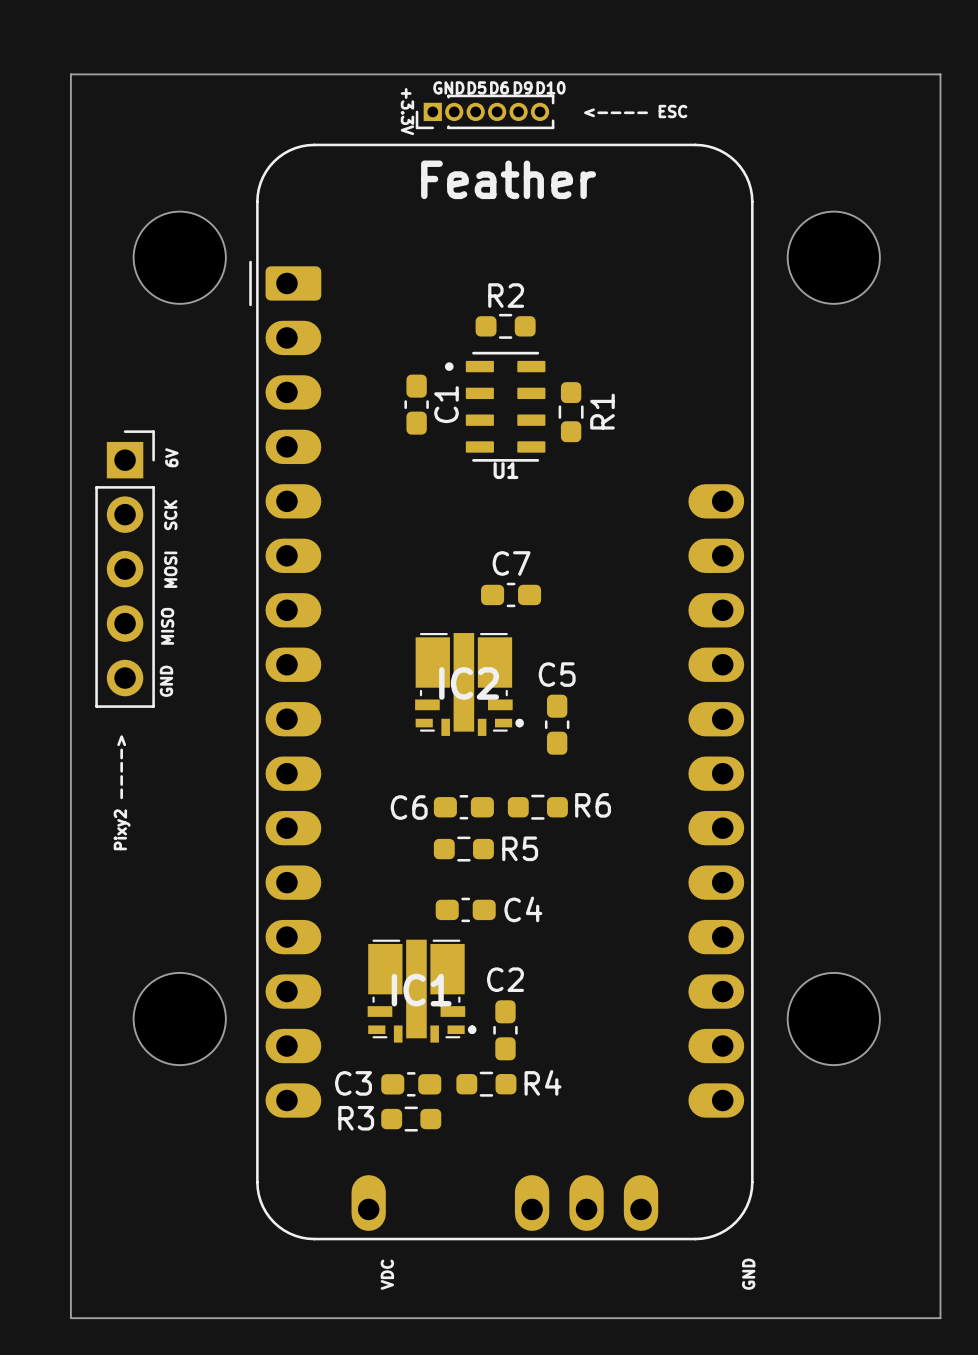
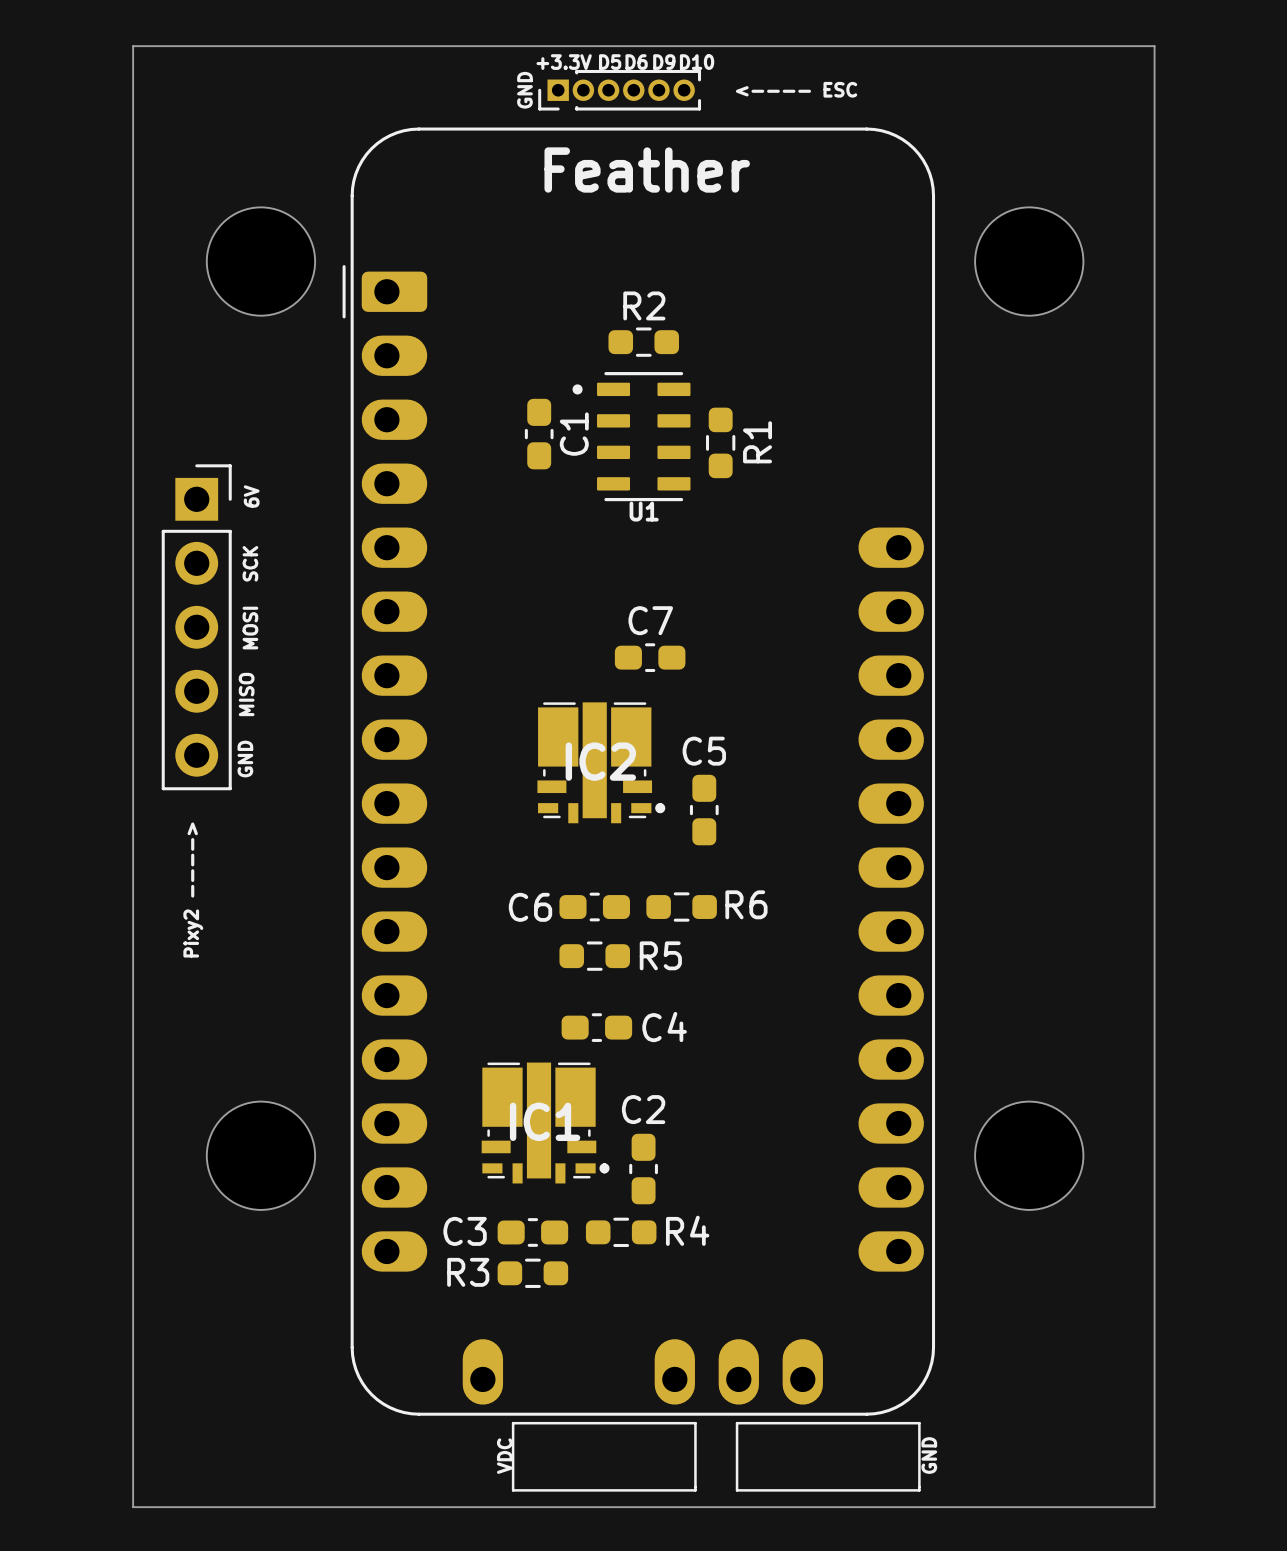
text: GND (448, 87) -> +3.3V (564, 62)
text: +3.3V (407, 111) -> GND (524, 90)
line: none -> (513, 1423) (695, 1423) (695, 1490) (513, 1490) (513, 1423)
line: none -> (737, 1423) (919, 1423) (919, 1490) (737, 1490) (737, 1423)

